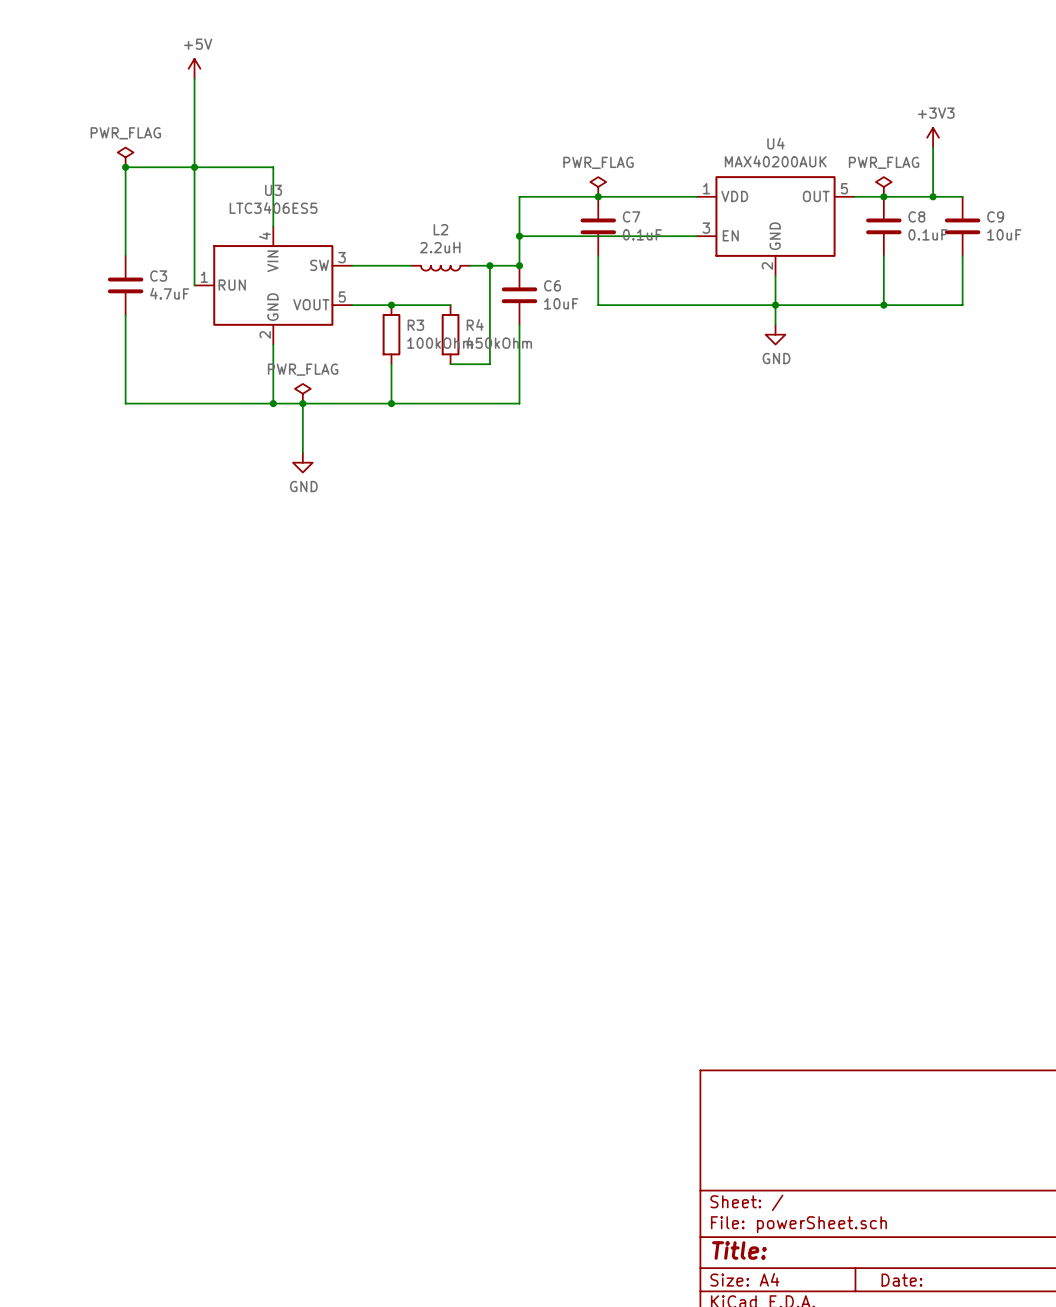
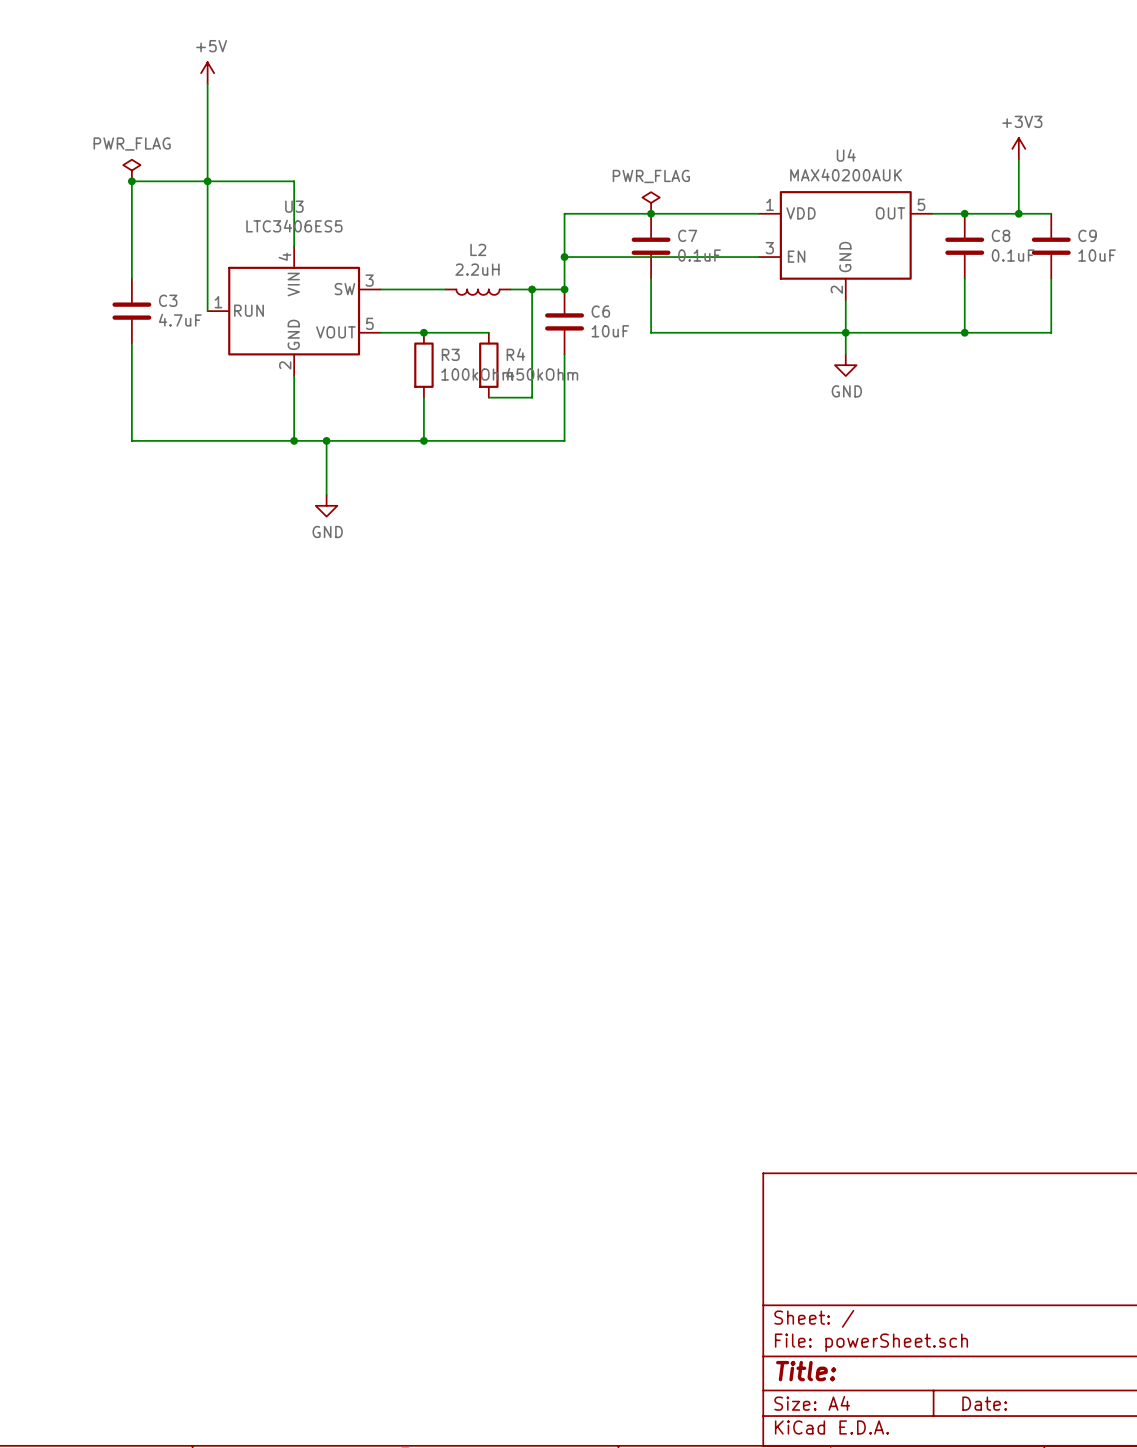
power symbol: PWR_FLAG (883, 186) -> none
power symbol: PWR_FLAG (302, 393) -> none

